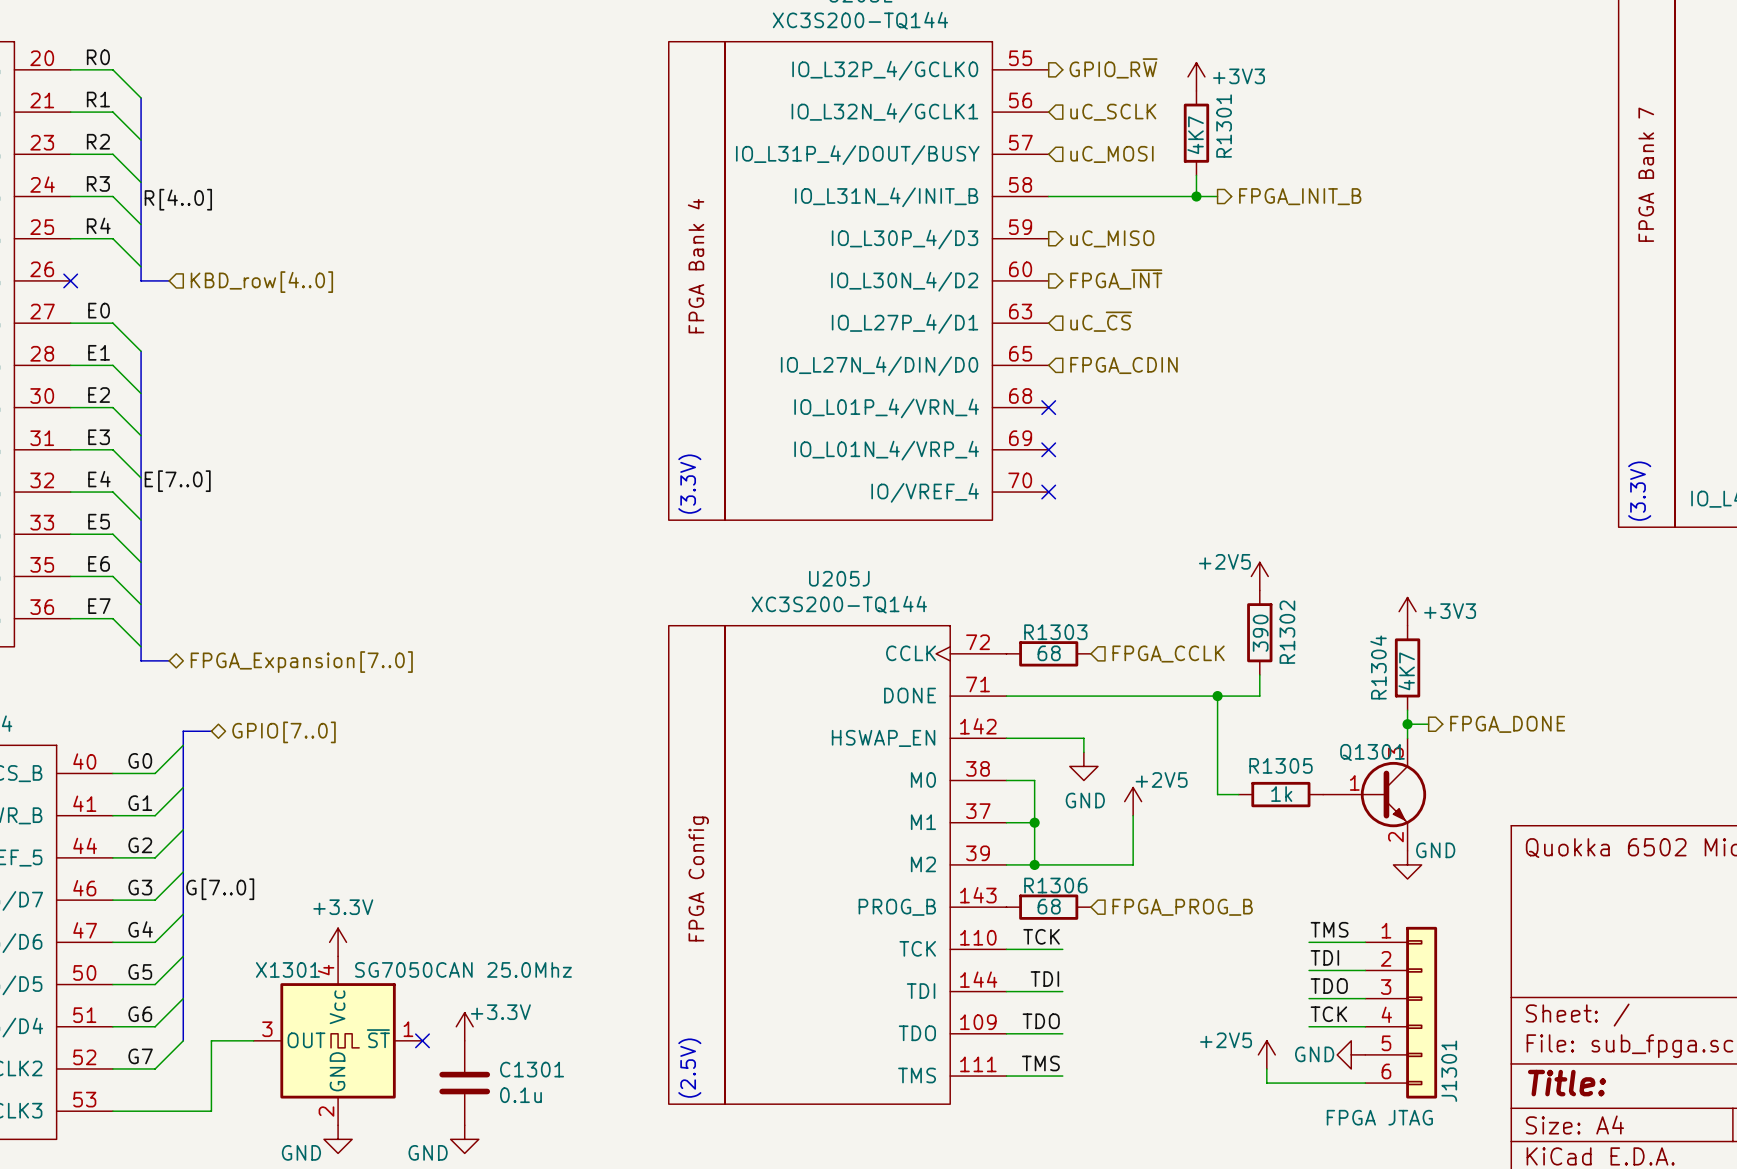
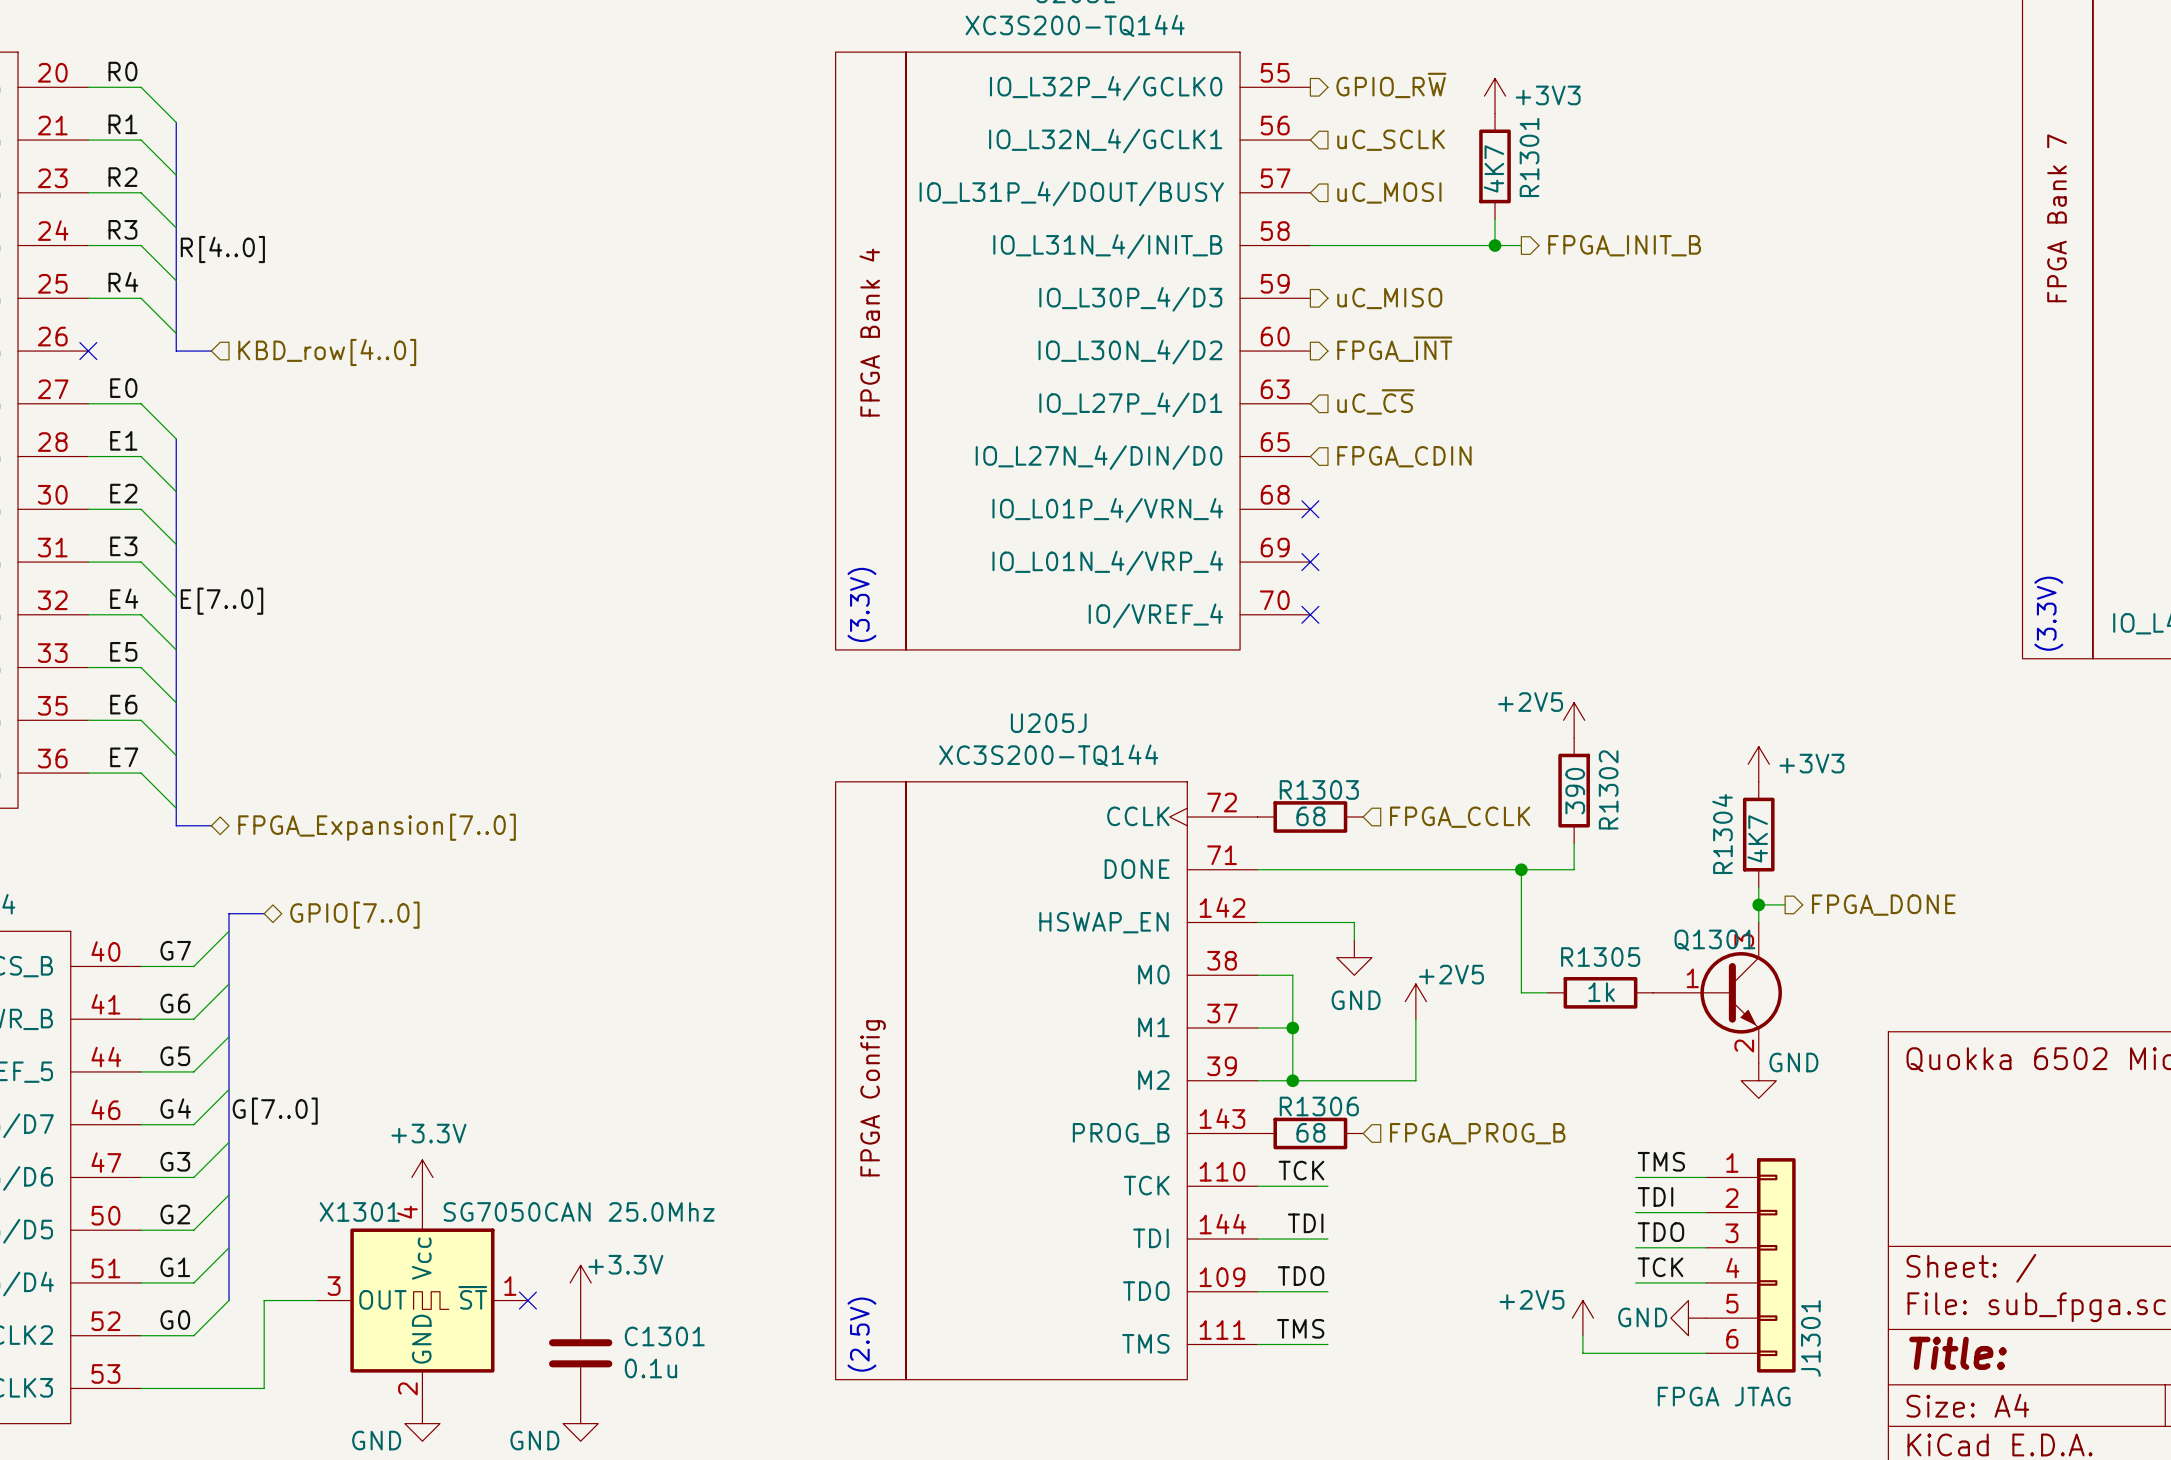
label: G0 (140, 760) -> G7 (175, 950)
label: G1 (140, 803) -> G6 (175, 1003)
label: G2 (140, 845) -> G5 (175, 1056)
label: G3 (140, 887) -> G4 (175, 1108)
label: G4 (140, 929) -> G3 (175, 1161)
label: G5 (140, 971) -> G2 (175, 1214)
label: G6 (140, 1014) -> G1 (175, 1267)
label: G7 (140, 1056) -> G0 (175, 1320)

